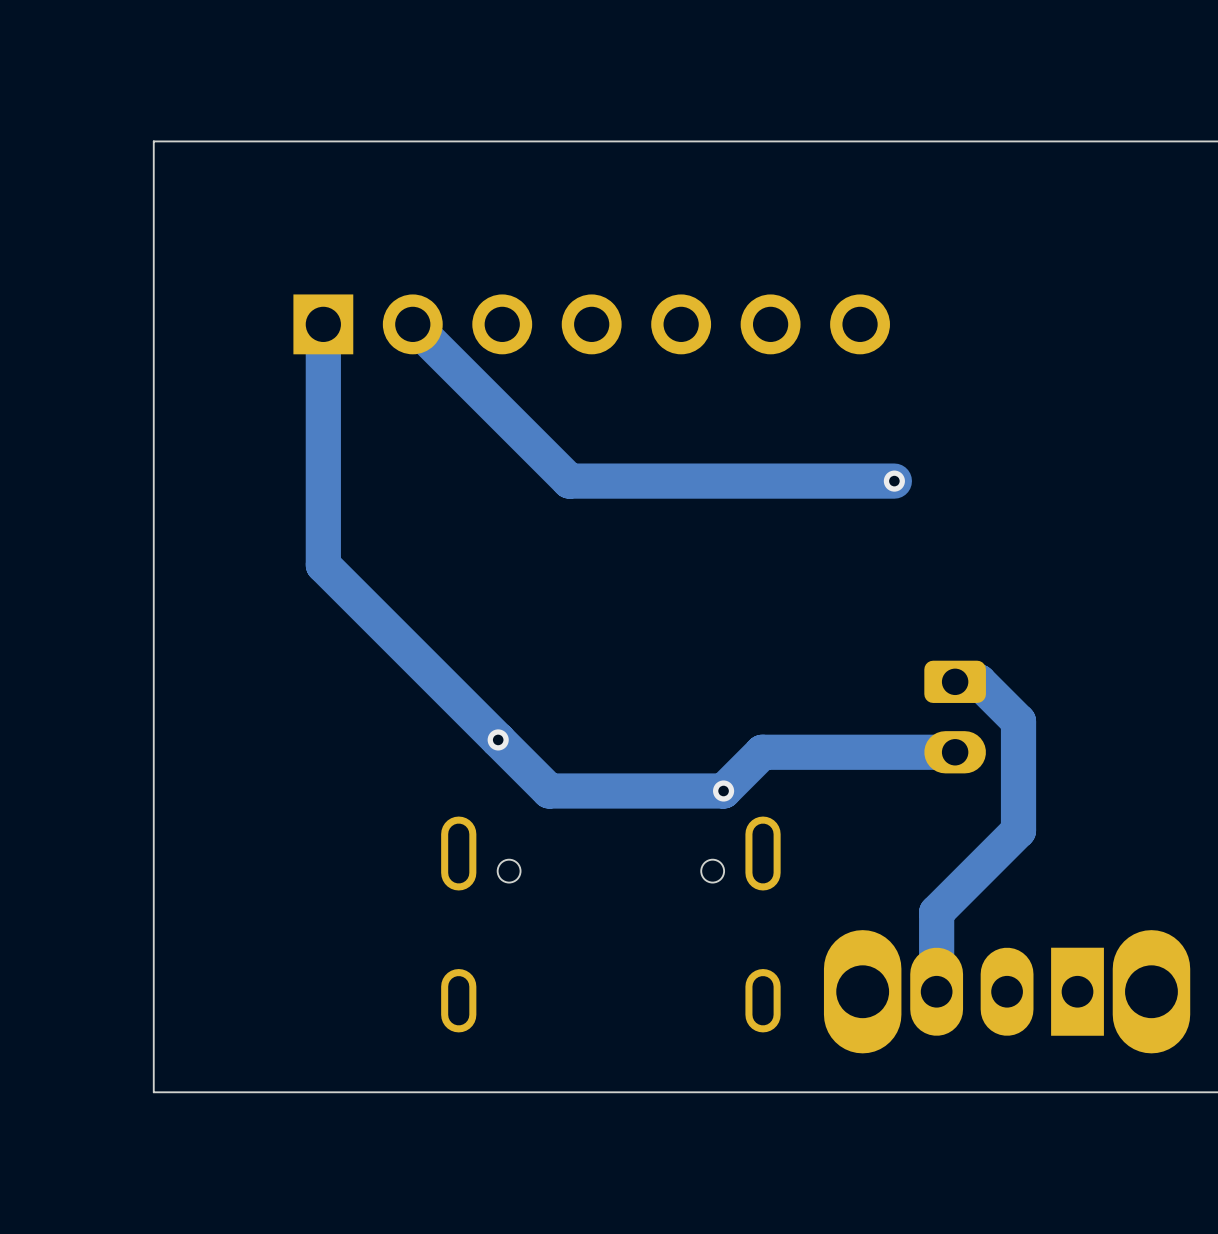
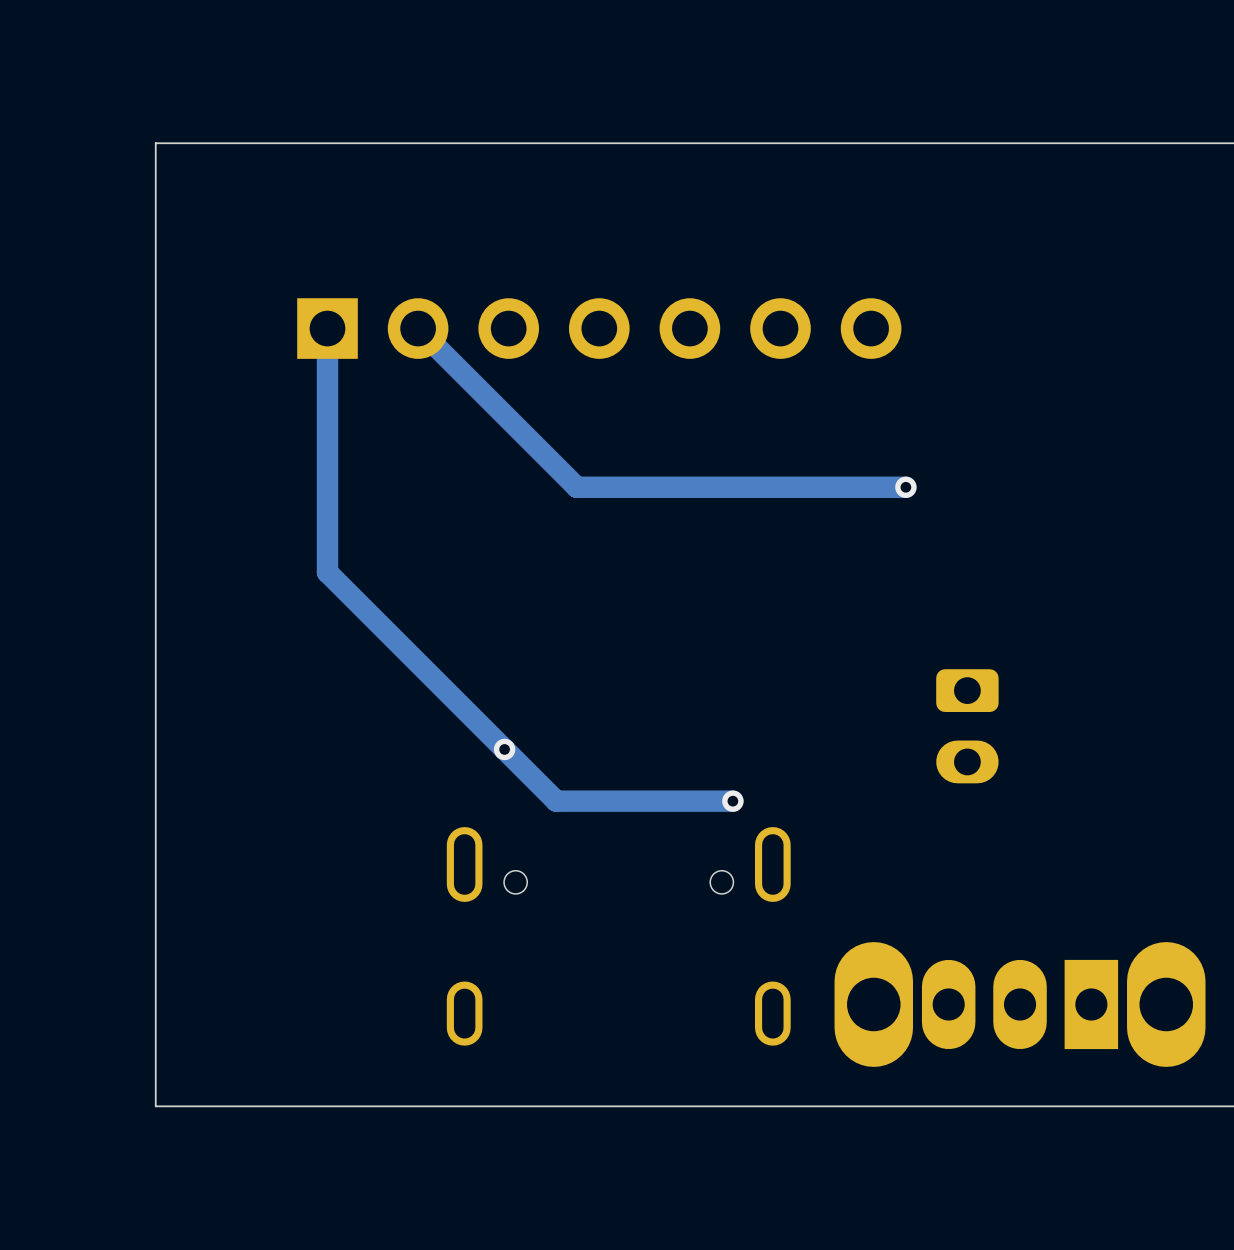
track width: thick (323, 324) (323, 565) (549, 791) (723, 791) -> thin (327, 328) (327, 572) (556, 801) (732, 801)
track width: thick (412, 324) (569, 481) (894, 481) -> thin (418, 328) (576, 487) (905, 487)
track: (955, 681) (978, 681) (1018, 721) (1018, 830) (936, 912) (936, 991) -> none
track: (955, 752) (762, 752) (723, 791) -> none

